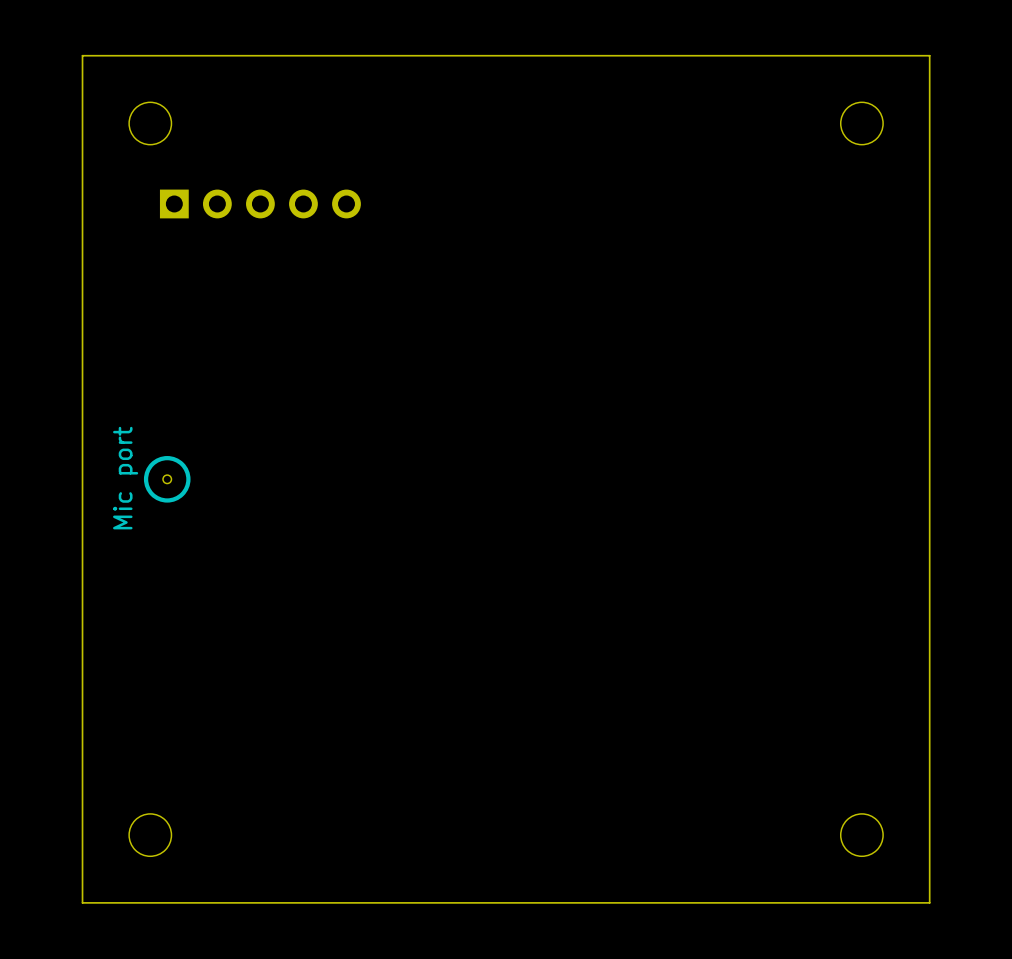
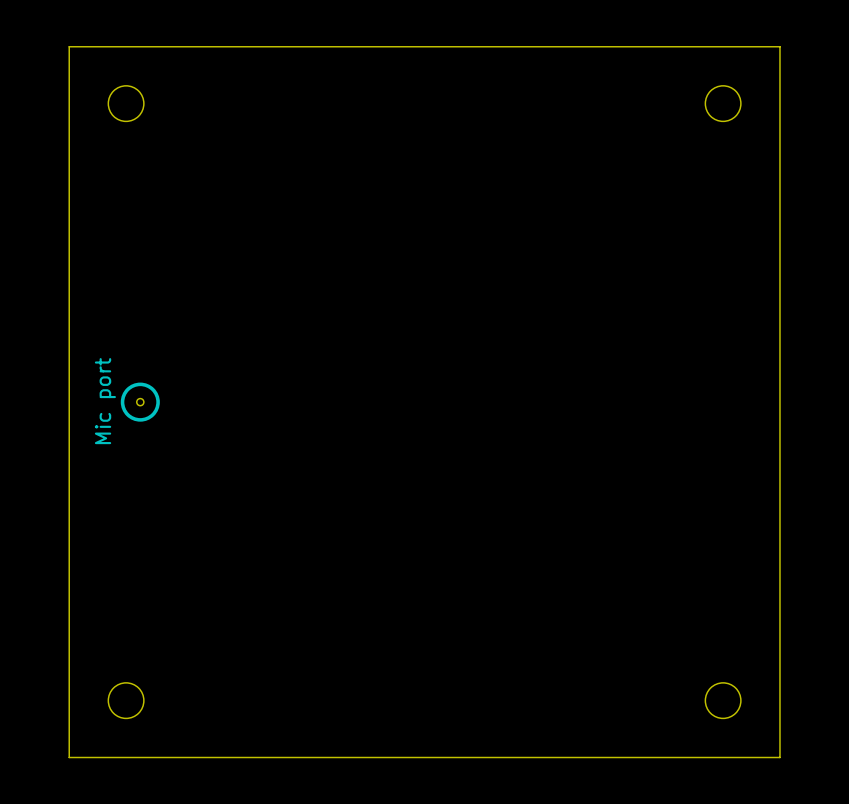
part: (260, 203) -> none

